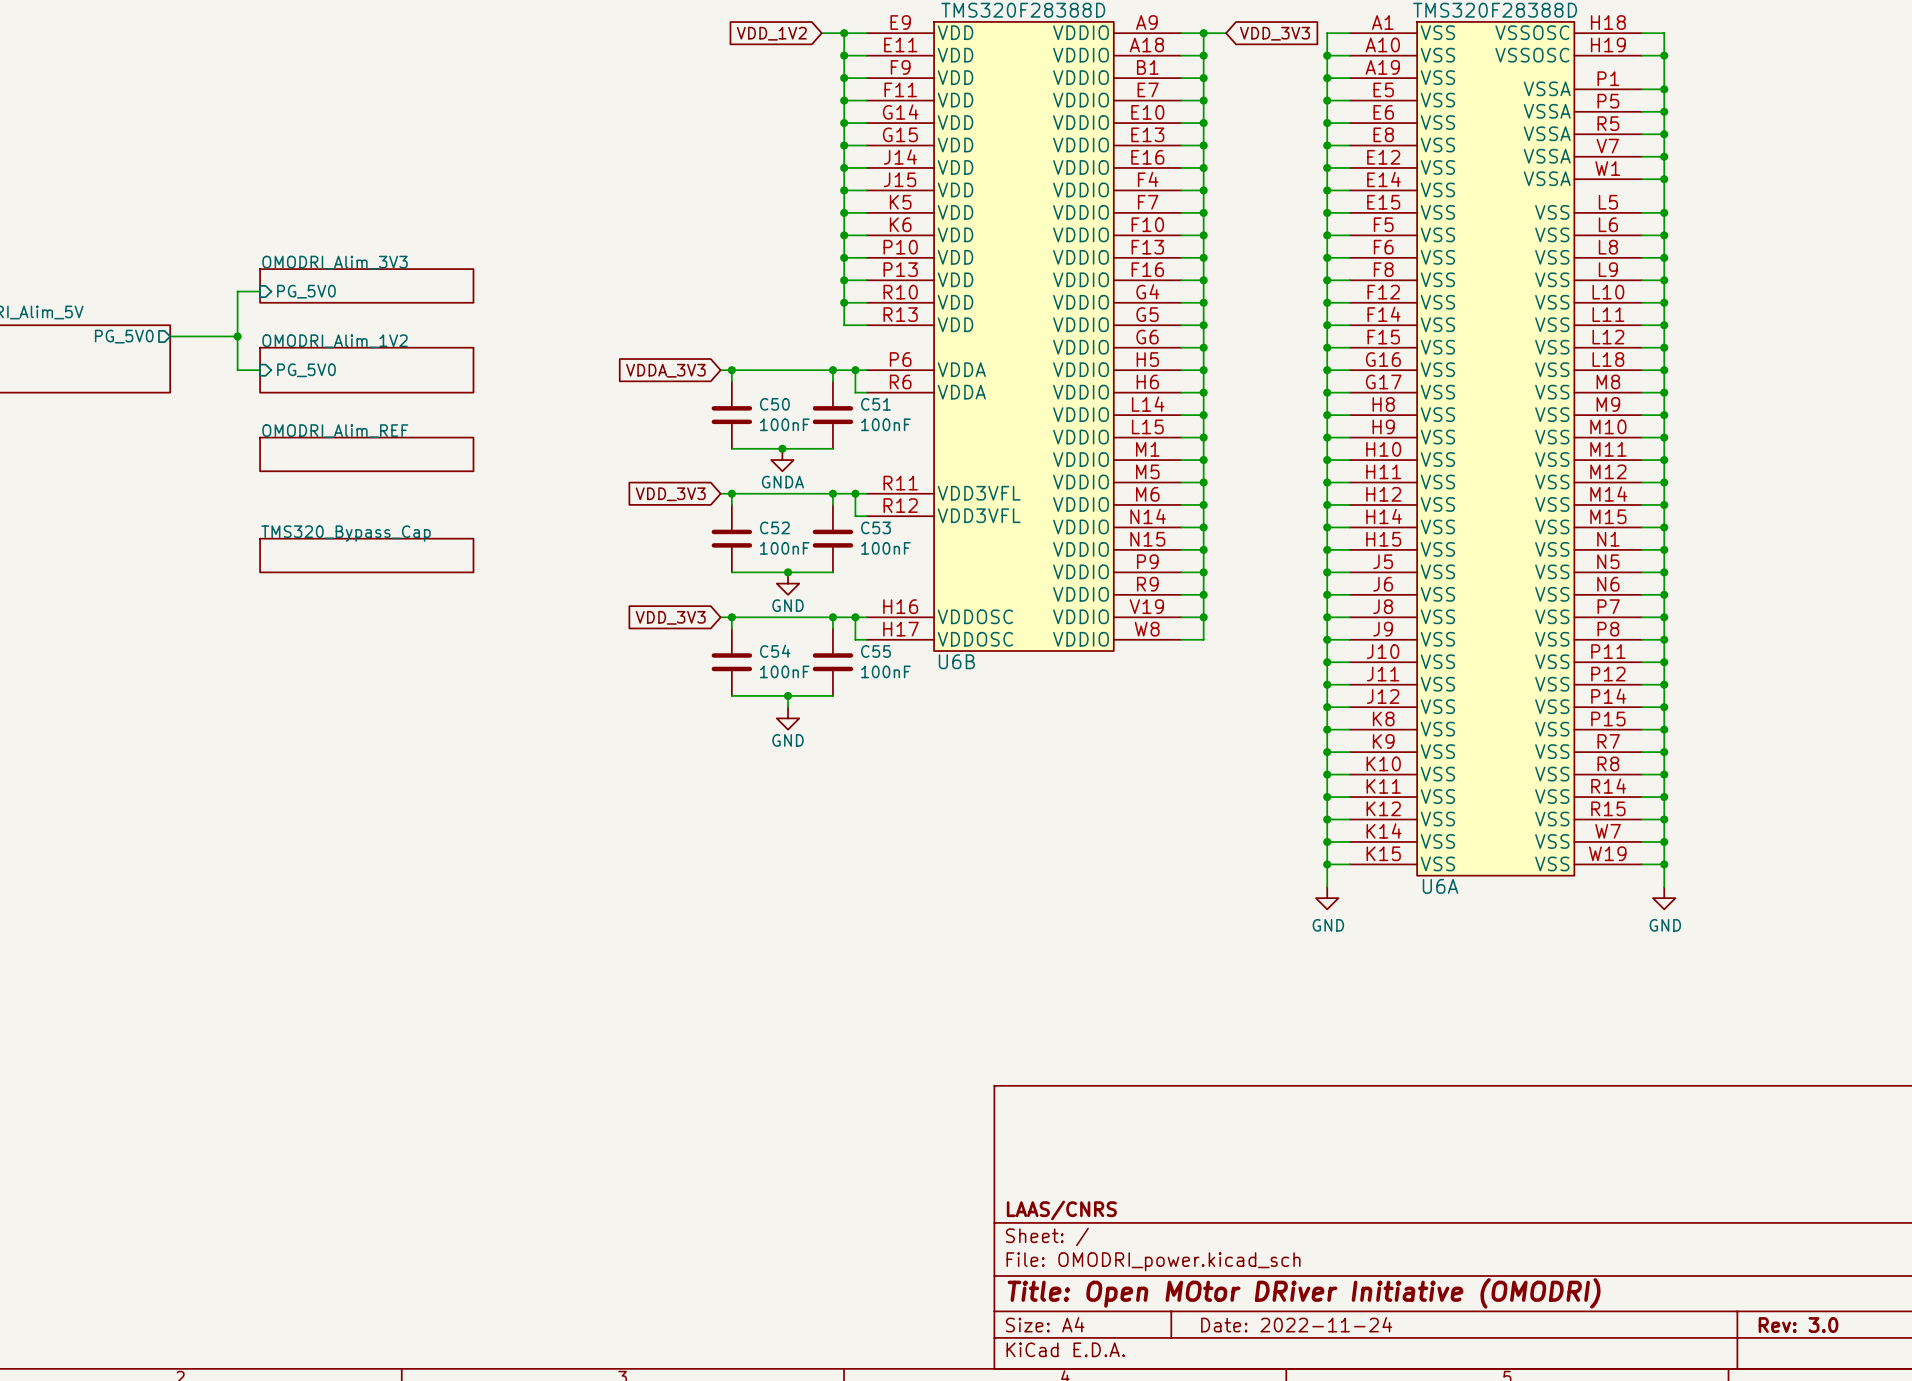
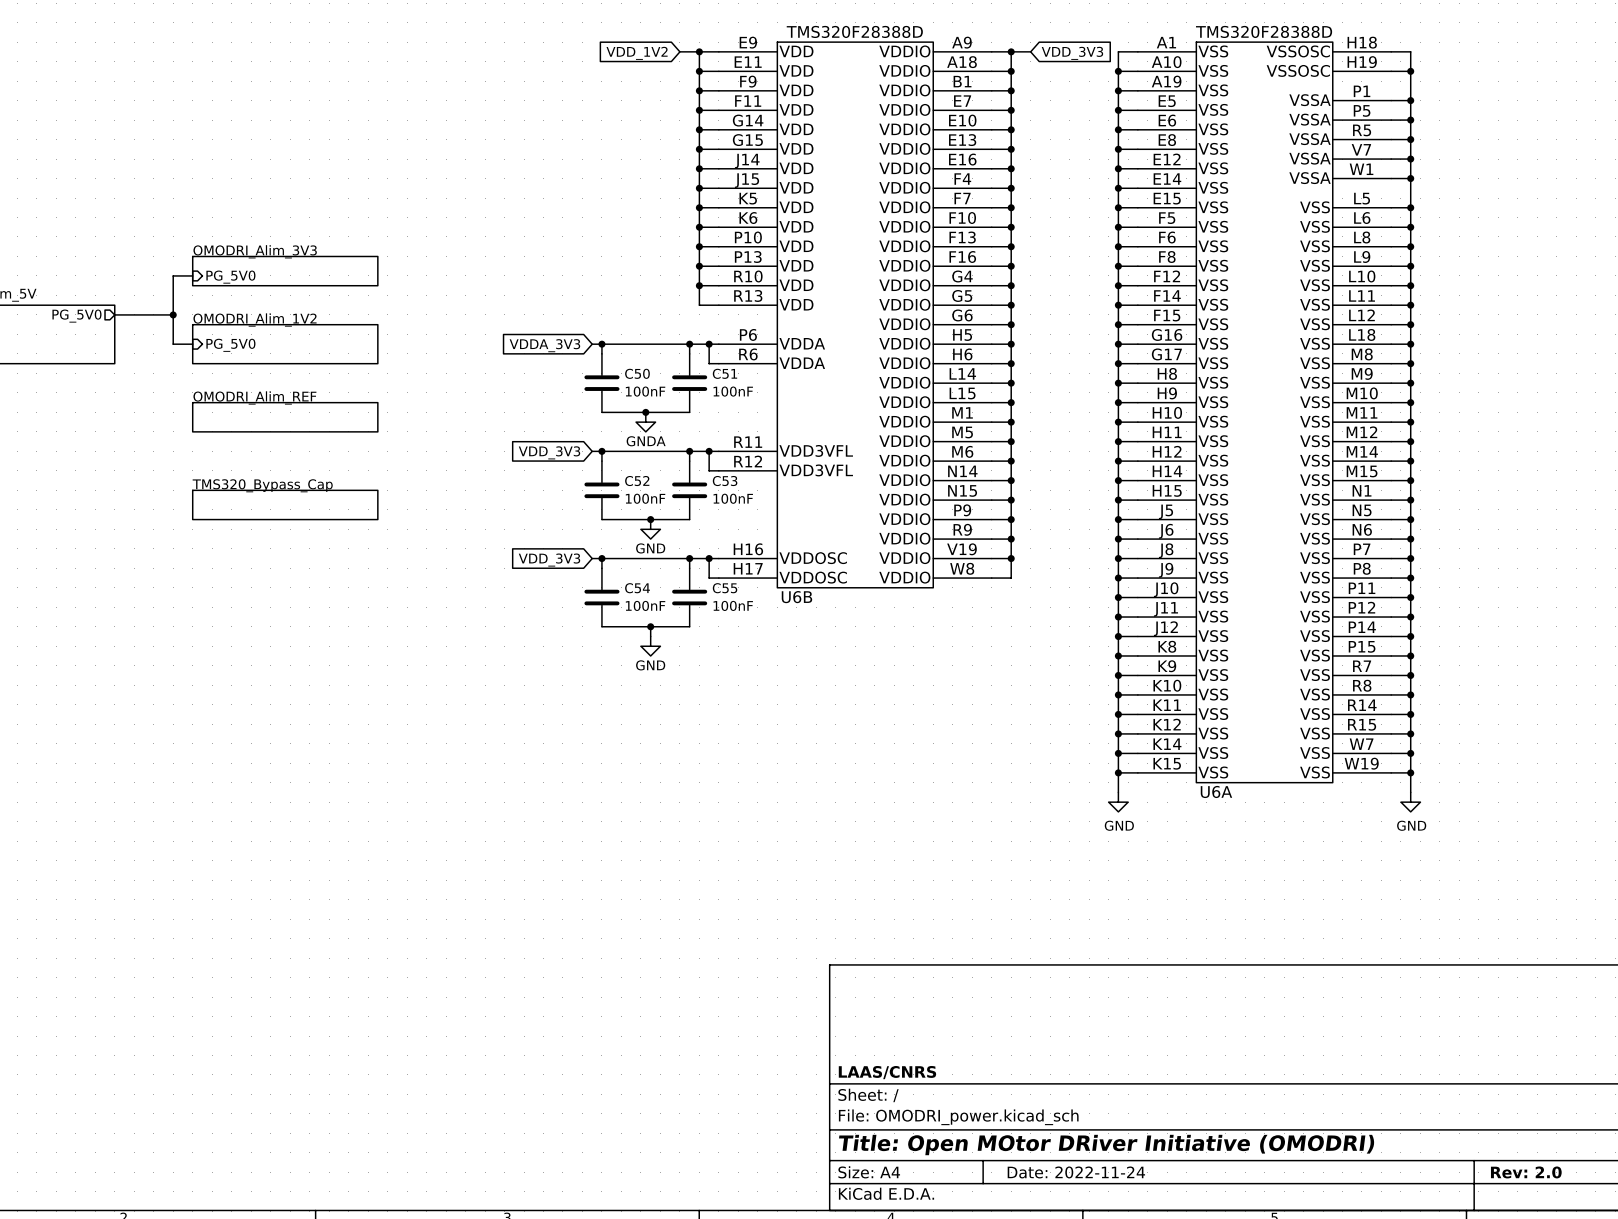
title block: Rev: 3.0 (1798, 1325) -> Rev: 2.0 (1526, 1172)

